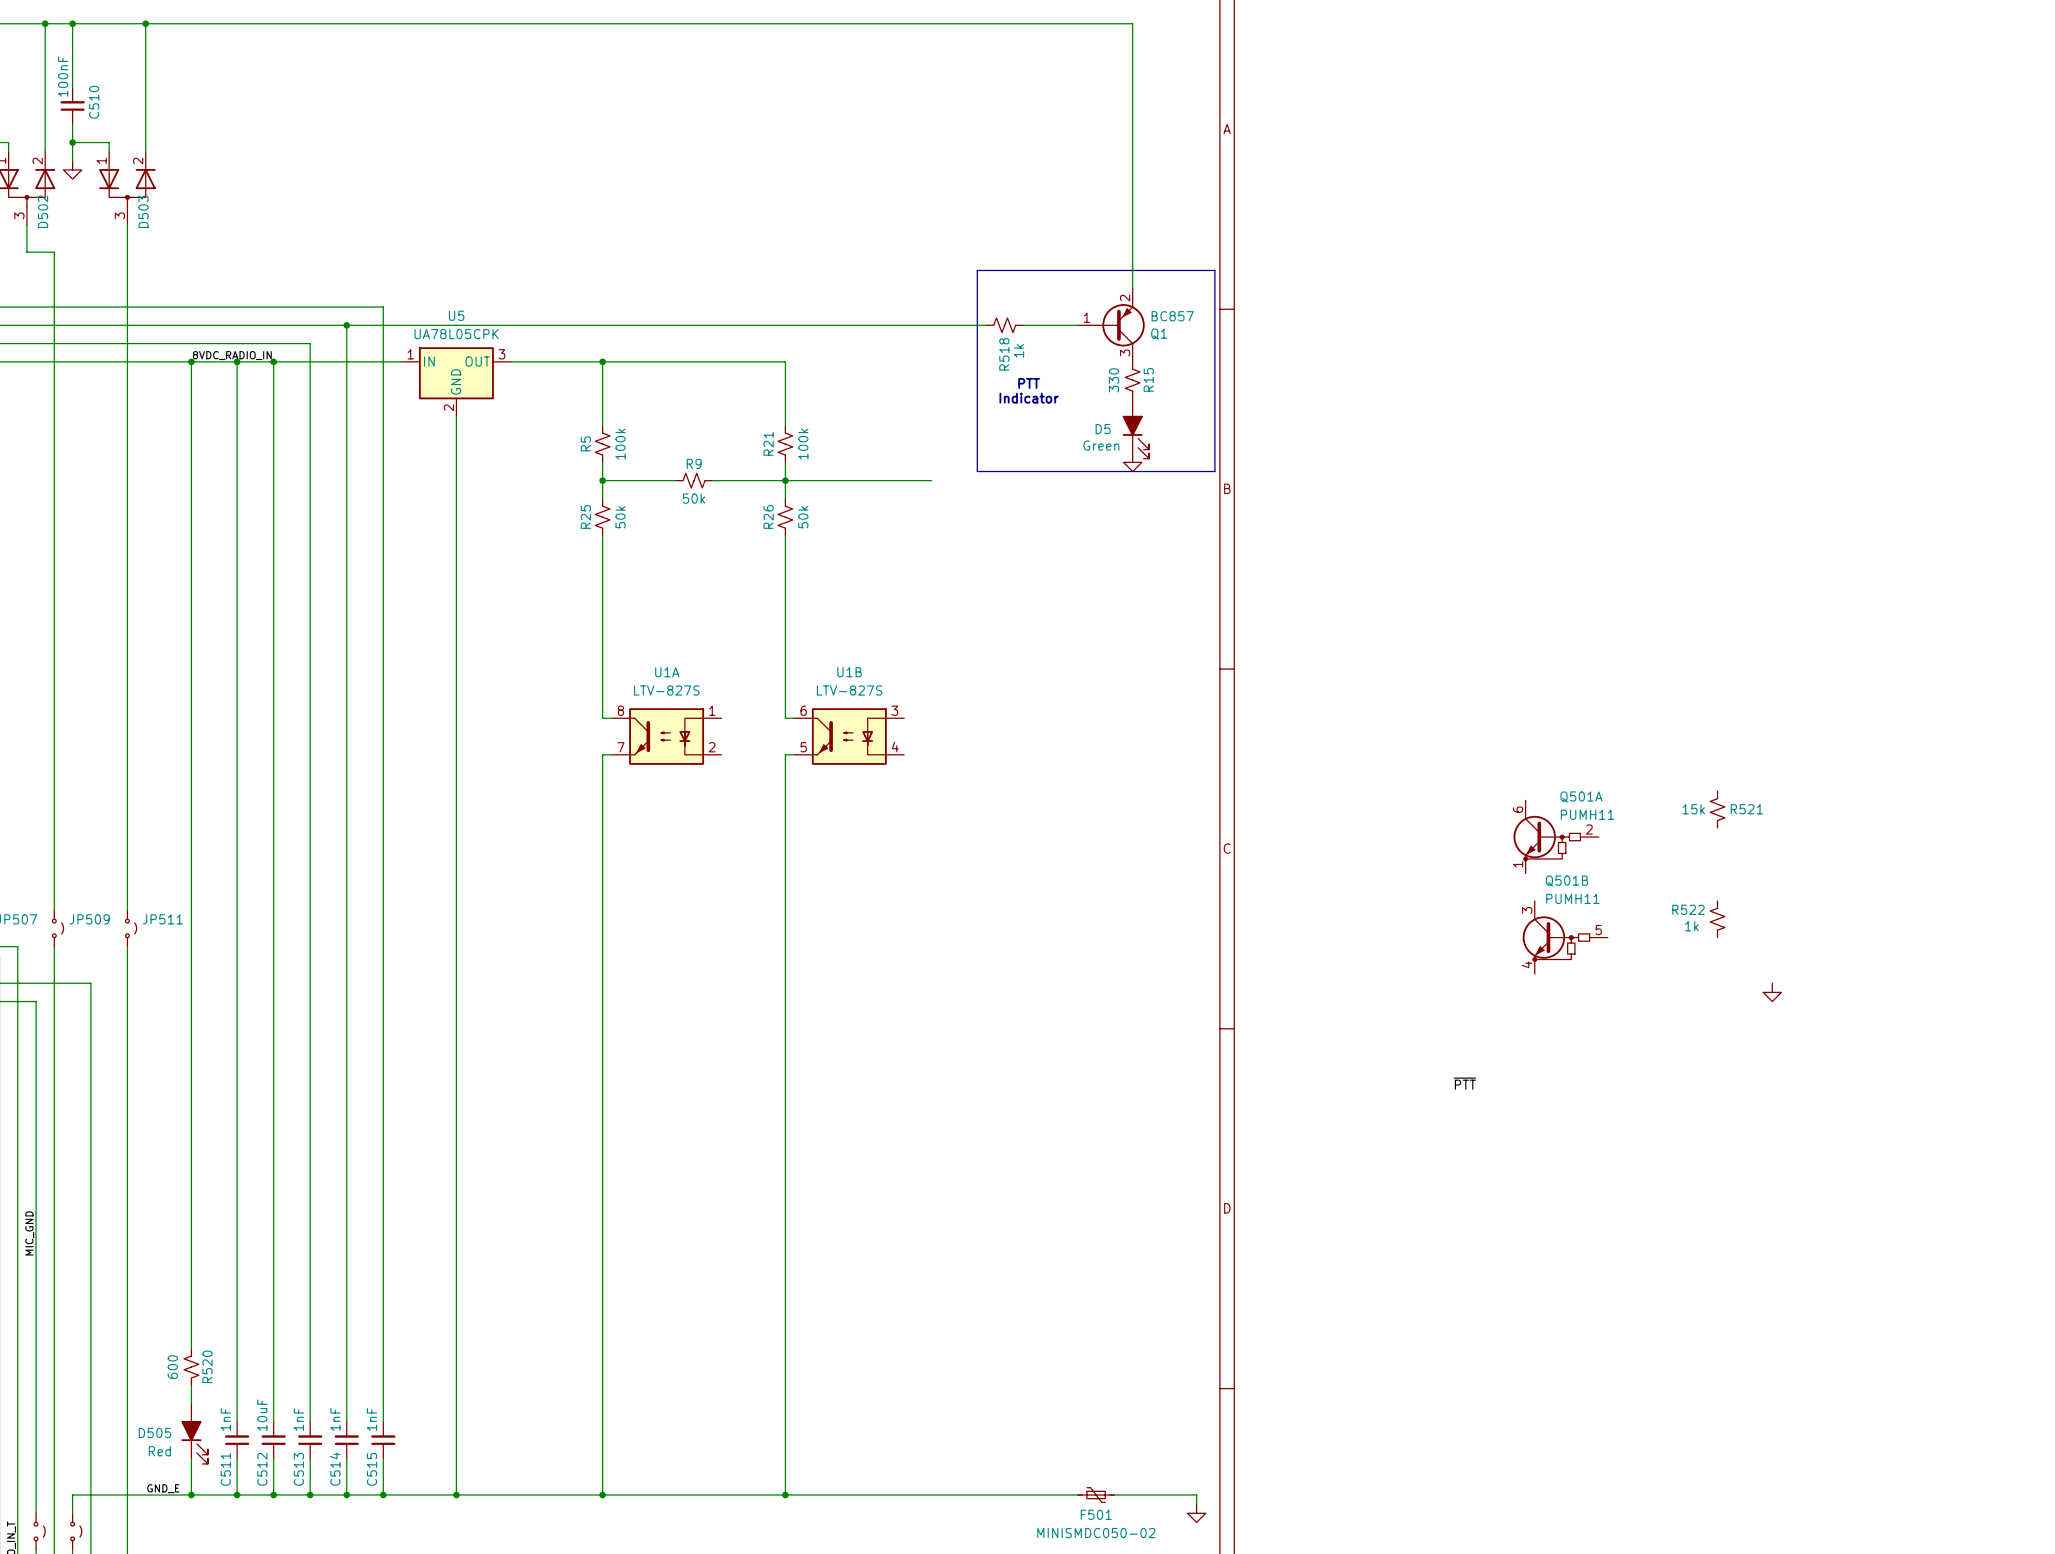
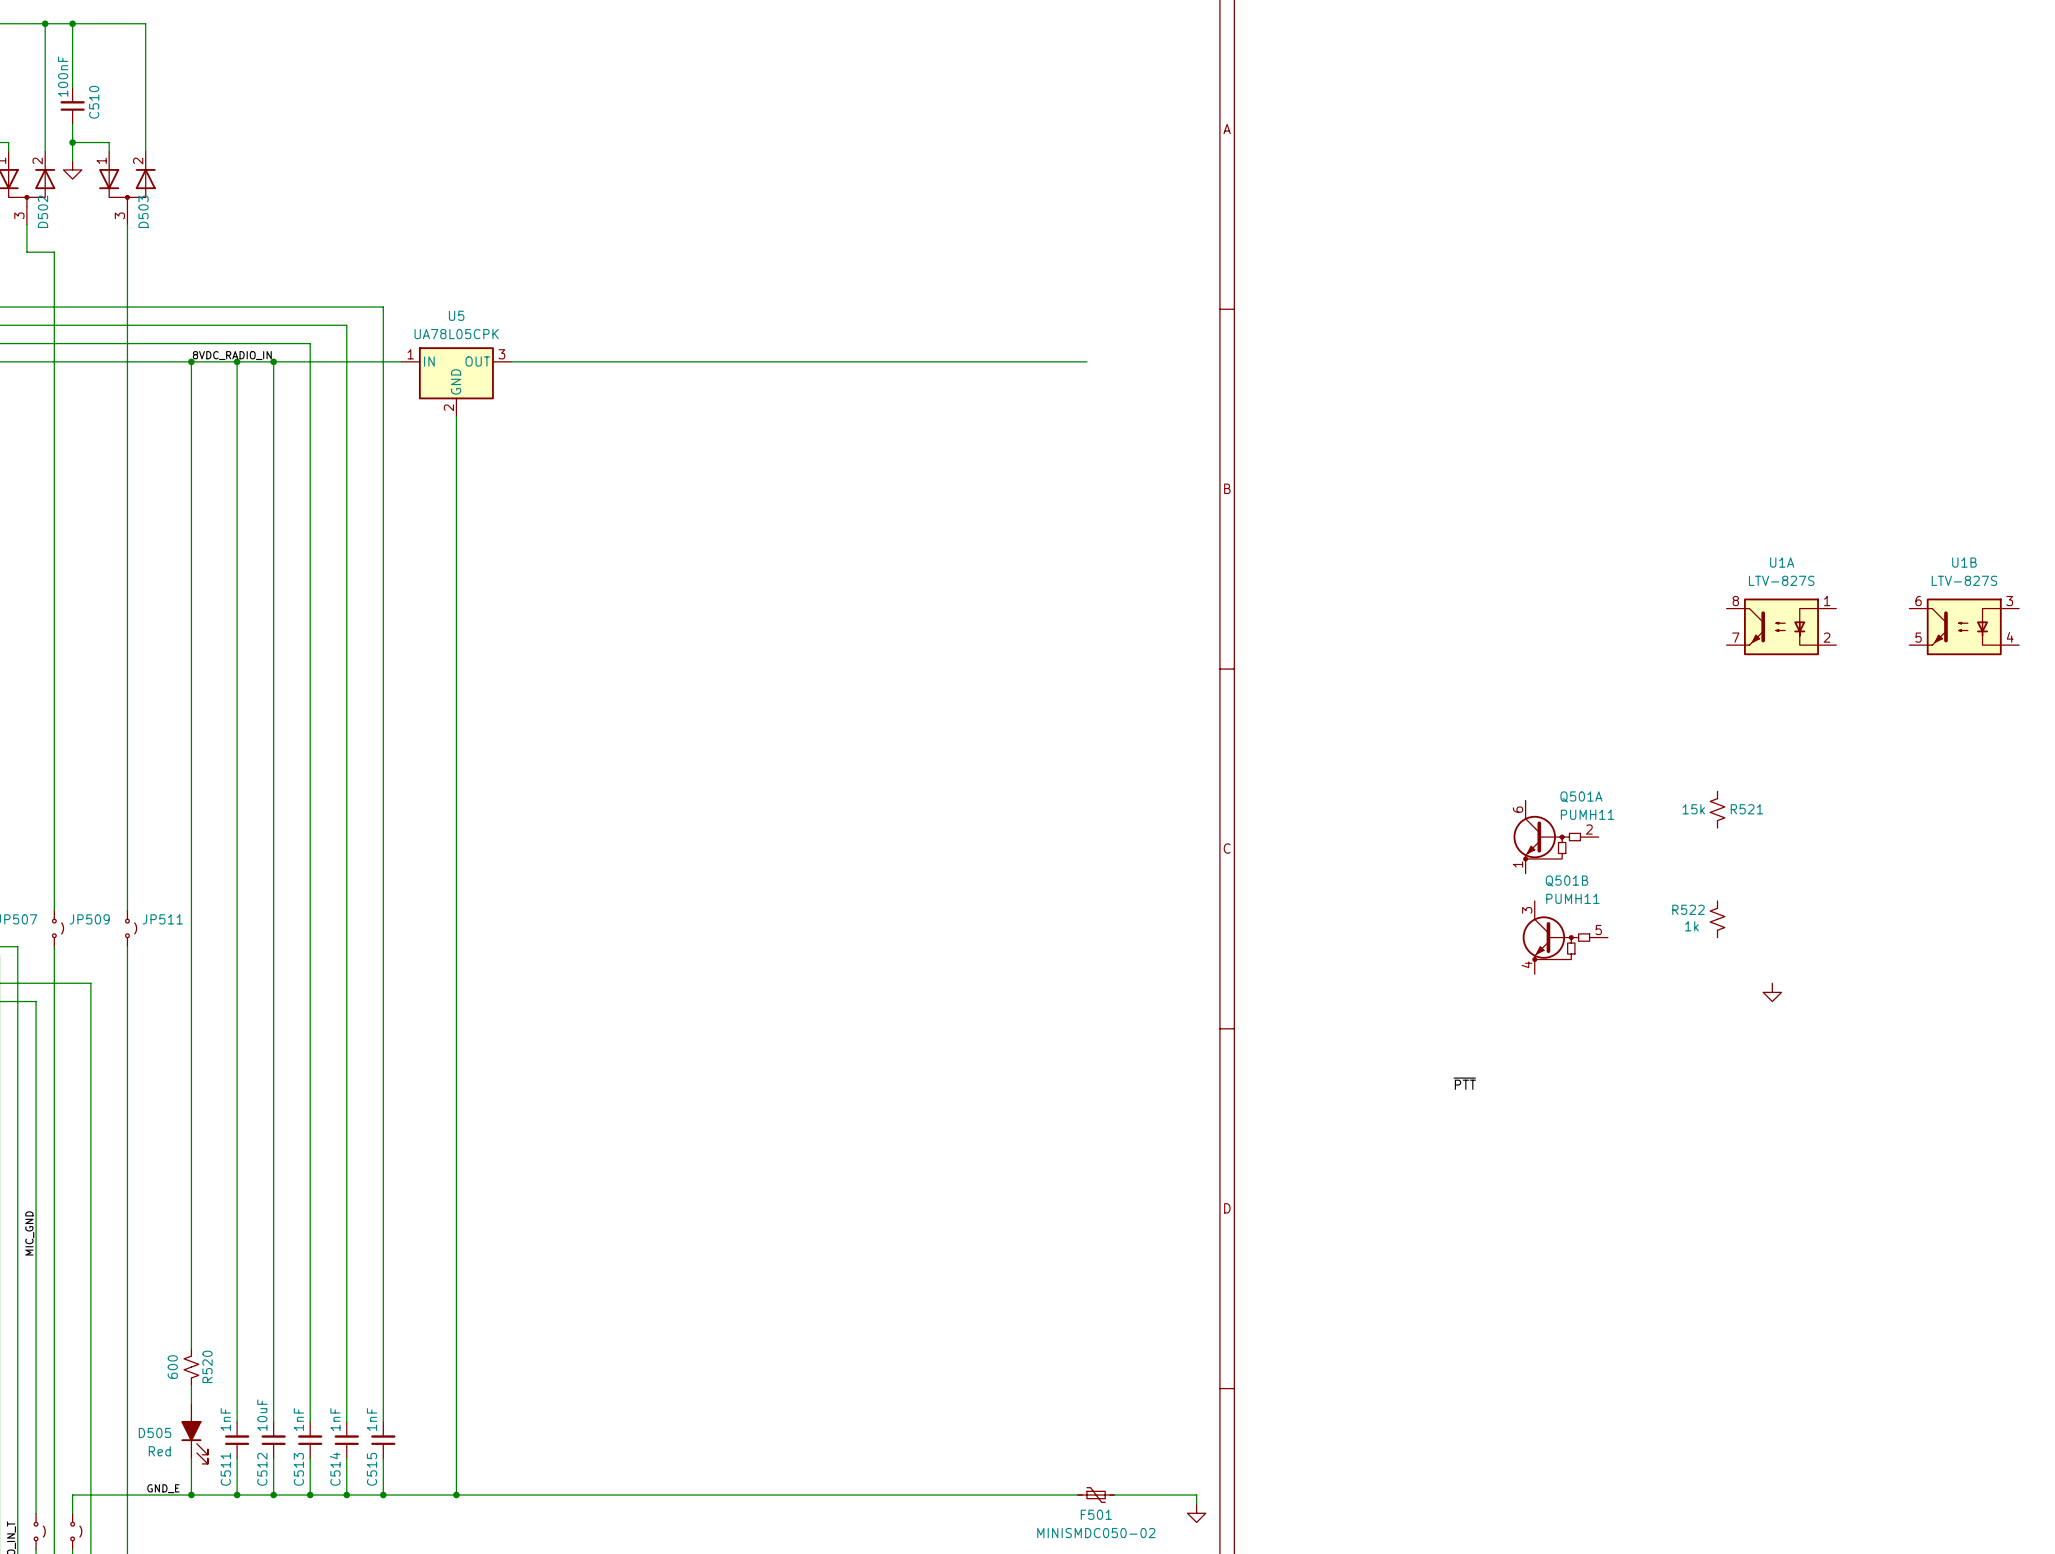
wire: (145, 23) (1132, 23) (1132, 288) -> none
junction: (145, 23) -> none
line: (977, 270) (1214, 270) (1214, 471) (977, 471) (977, 270) -> none
wire: (346, 325) (986, 325) -> none
junction: (346, 325) -> none
R518: 1k (1004, 325) -> none
wire: (1023, 325) (1077, 325) -> none
Q1: BC857 (1111, 325) -> none
wire: (602, 361) (602, 425) -> none
junction: (602, 361) -> none
wire: (785, 361) (785, 425) -> (785, 361) (1086, 361)
R15: 330 (1132, 380) -> none
text: PTT (1029, 383) -> none
text: Indicator (1029, 398) -> none
D5: Green (1135, 428) -> none
R5: 100k (602, 444) -> none
R21: 100k (785, 444) -> none
wire: (602, 462) (602, 498) -> none
wire: (785, 462) (785, 498) -> none
power symbol: (1132, 462) -> none
wire: (602, 480) (675, 480) -> none
junction: (602, 480) -> none
R9: 50k (694, 480) -> none
wire: (712, 480) (931, 480) -> none
junction: (785, 480) -> none
R25: 50k (602, 517) -> none
R26: 50k (785, 517) -> none
wire: (602, 535) (602, 718) (611, 718) -> none
wire: (785, 535) (785, 718) (794, 718) -> none
U1A position: (666, 736) -> (1781, 626)
U1B position: (849, 736) -> (1964, 626)
wire: (611, 754) (602, 754) (602, 1495) -> none
wire: (794, 754) (785, 754) (785, 1495) -> none
junction: (602, 1495) -> none
junction: (785, 1495) -> none

